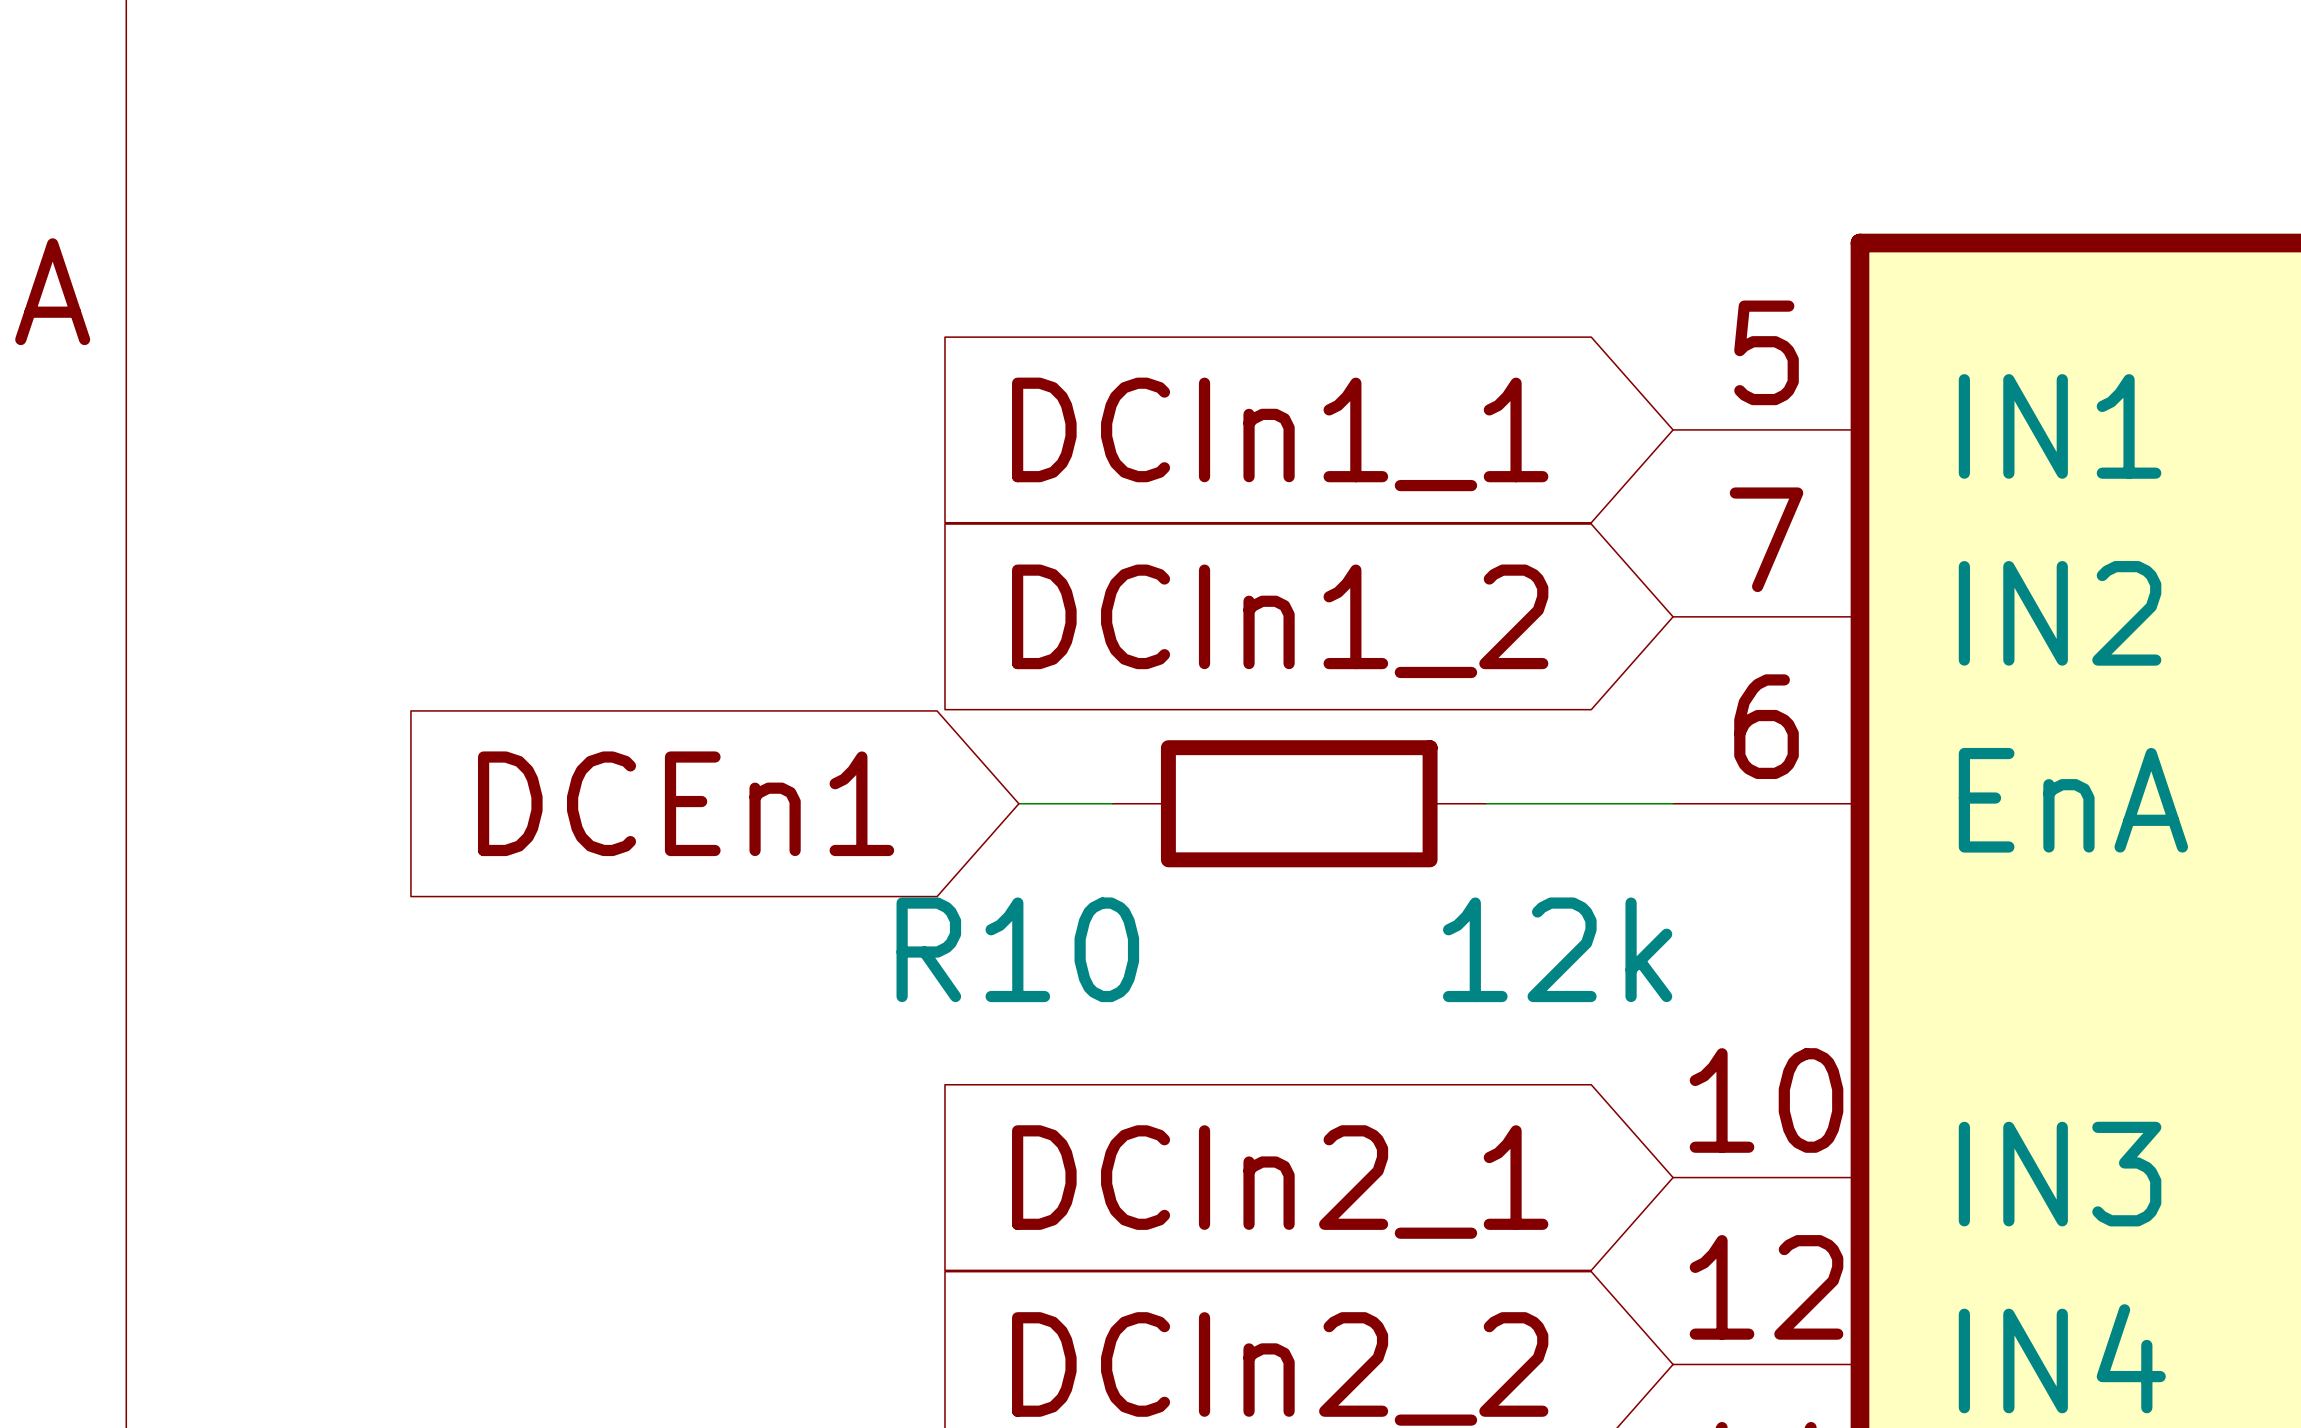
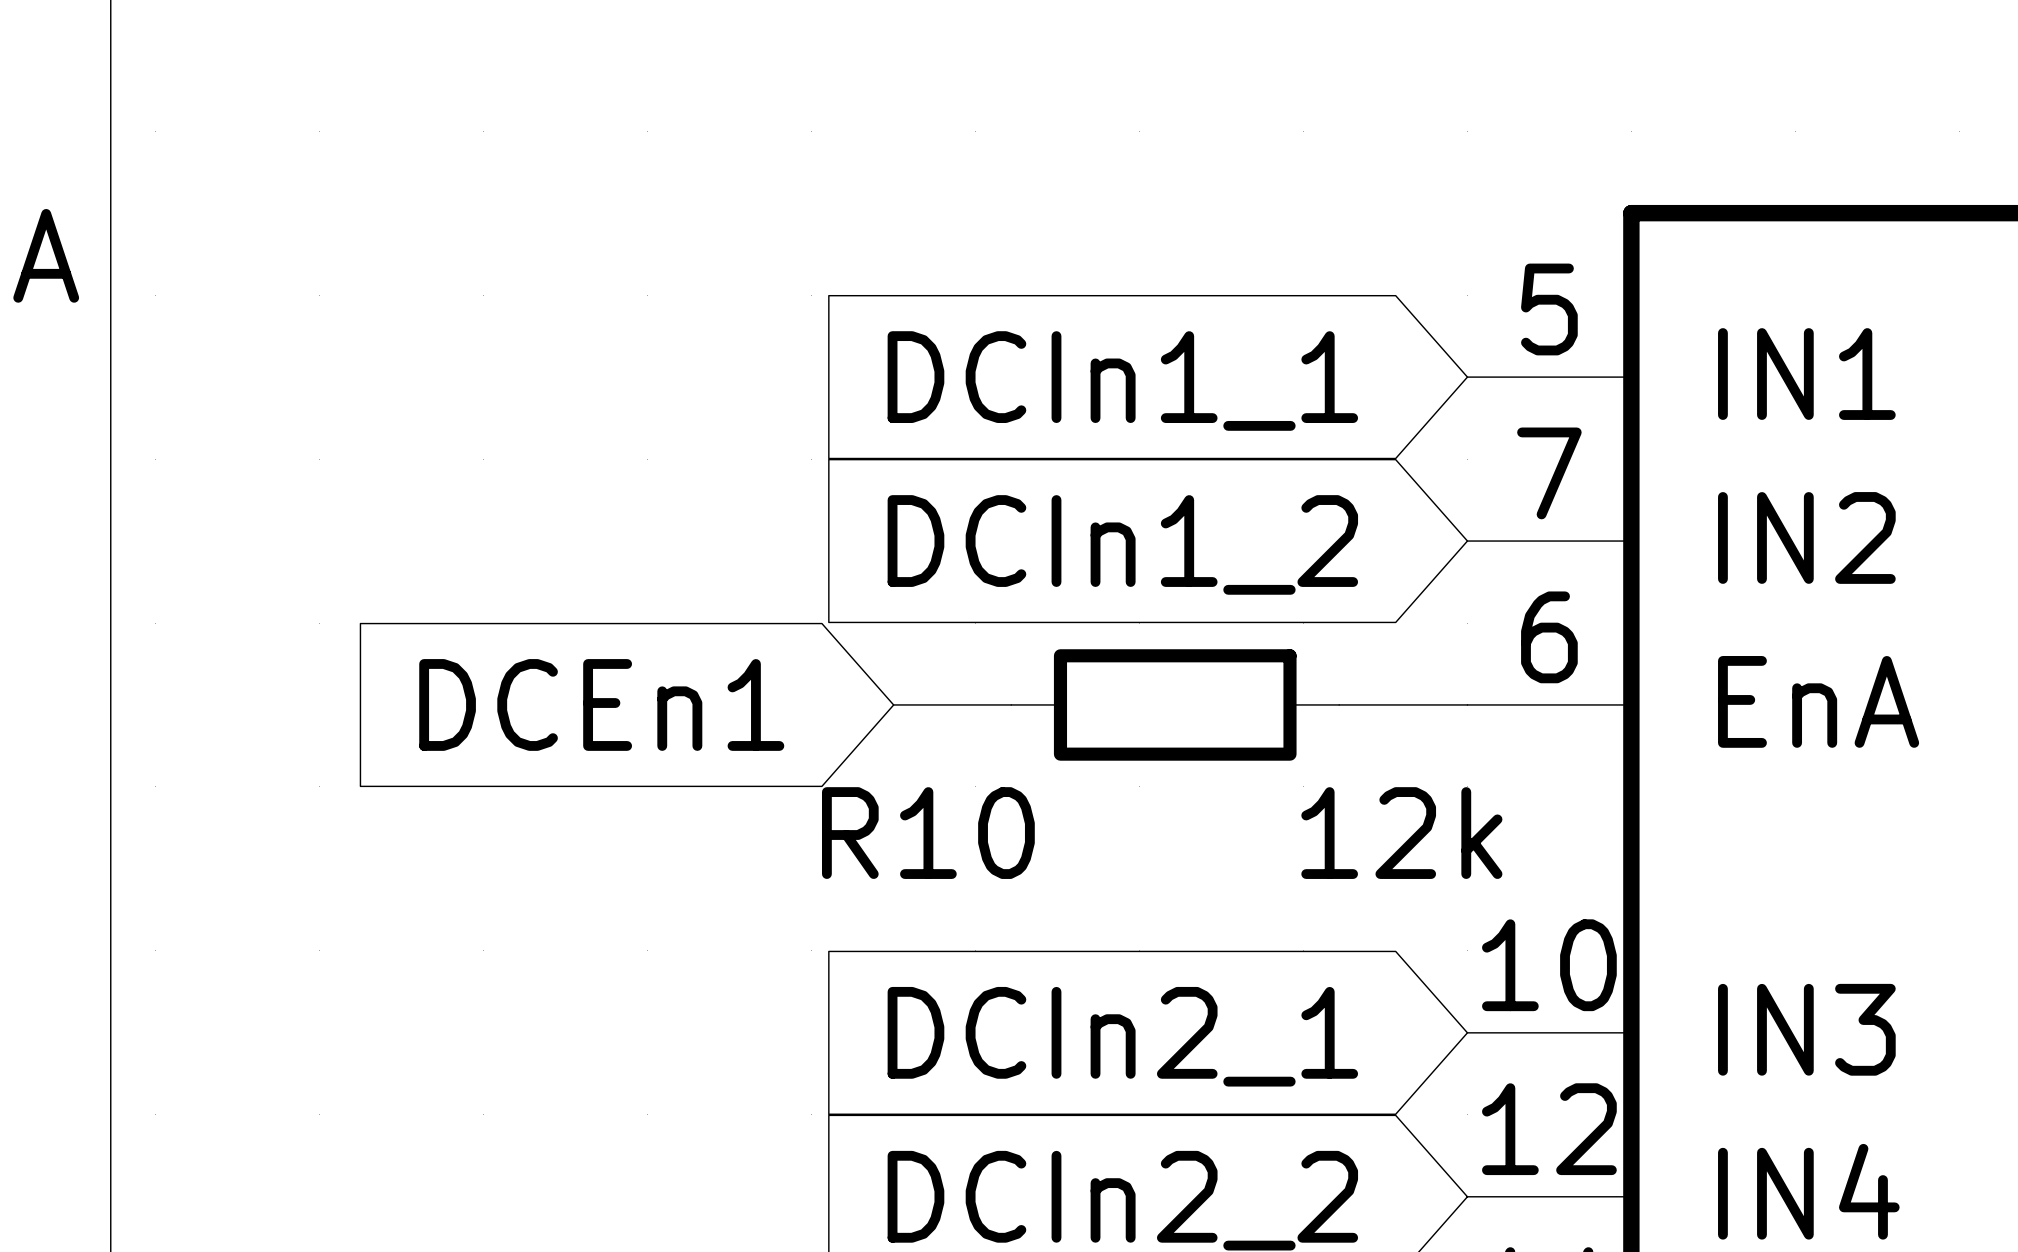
R10 position: (1299, 803) -> (1175, 704)

